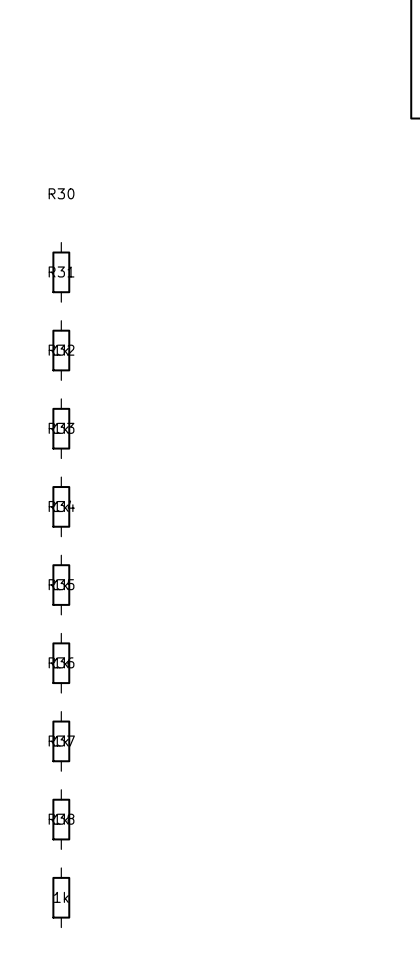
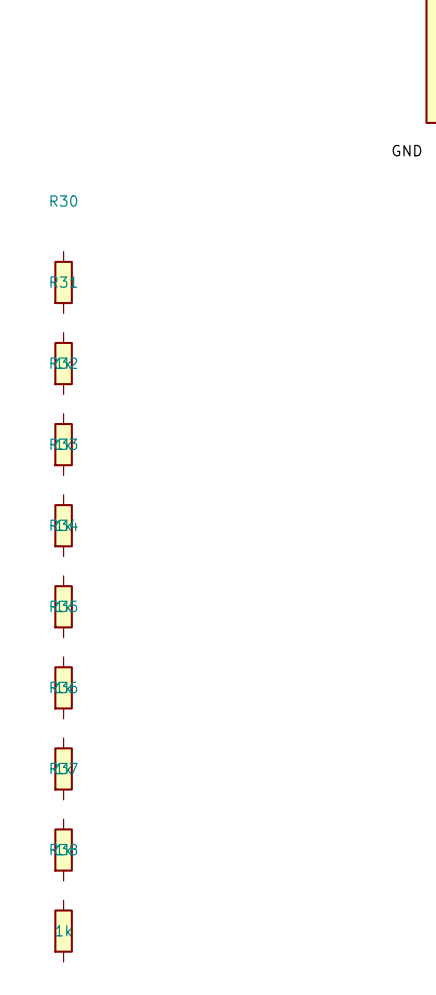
label: none -> GND (406, 150)

